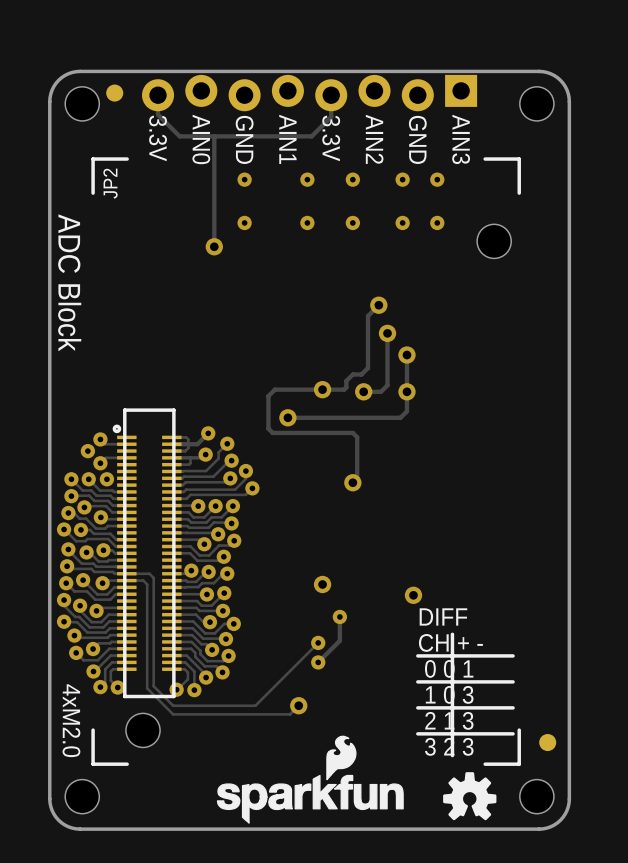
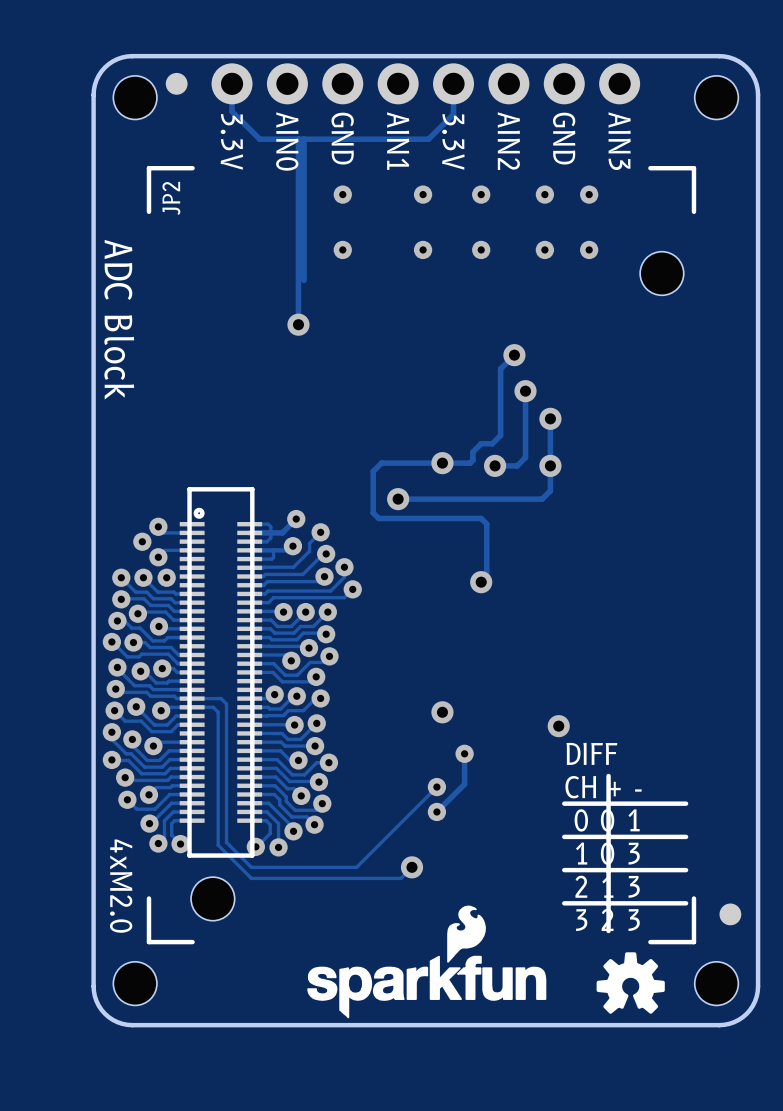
part footprint: [142, 74, 478, 112] -> [211, 63, 641, 105]
track: none -> (298, 139) (298, 324)
JP2 footprint: [91, 157, 521, 766] -> [146, 165, 697, 945]
via position: (214, 246) -> (298, 324)

